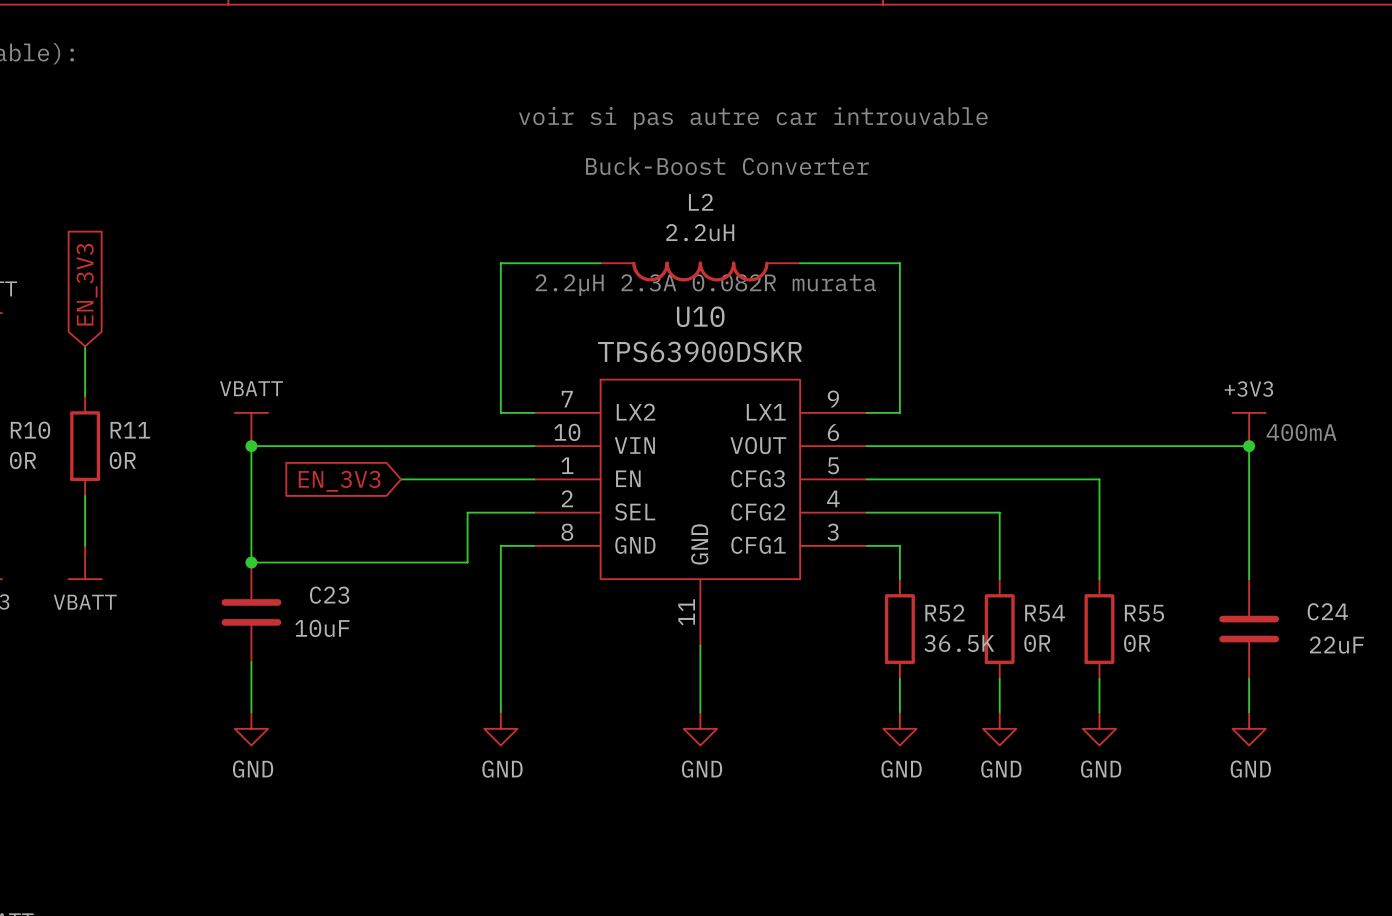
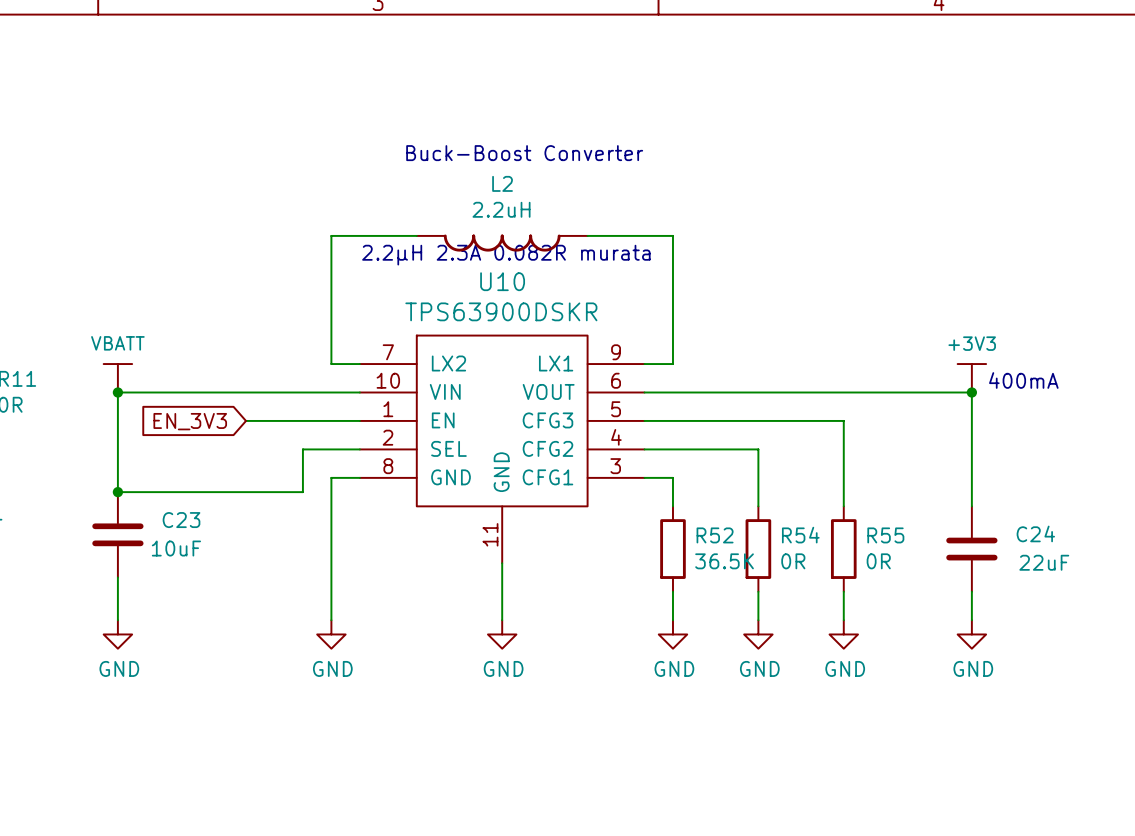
text: voir si pas autre car introuvable (753, 118) -> none

